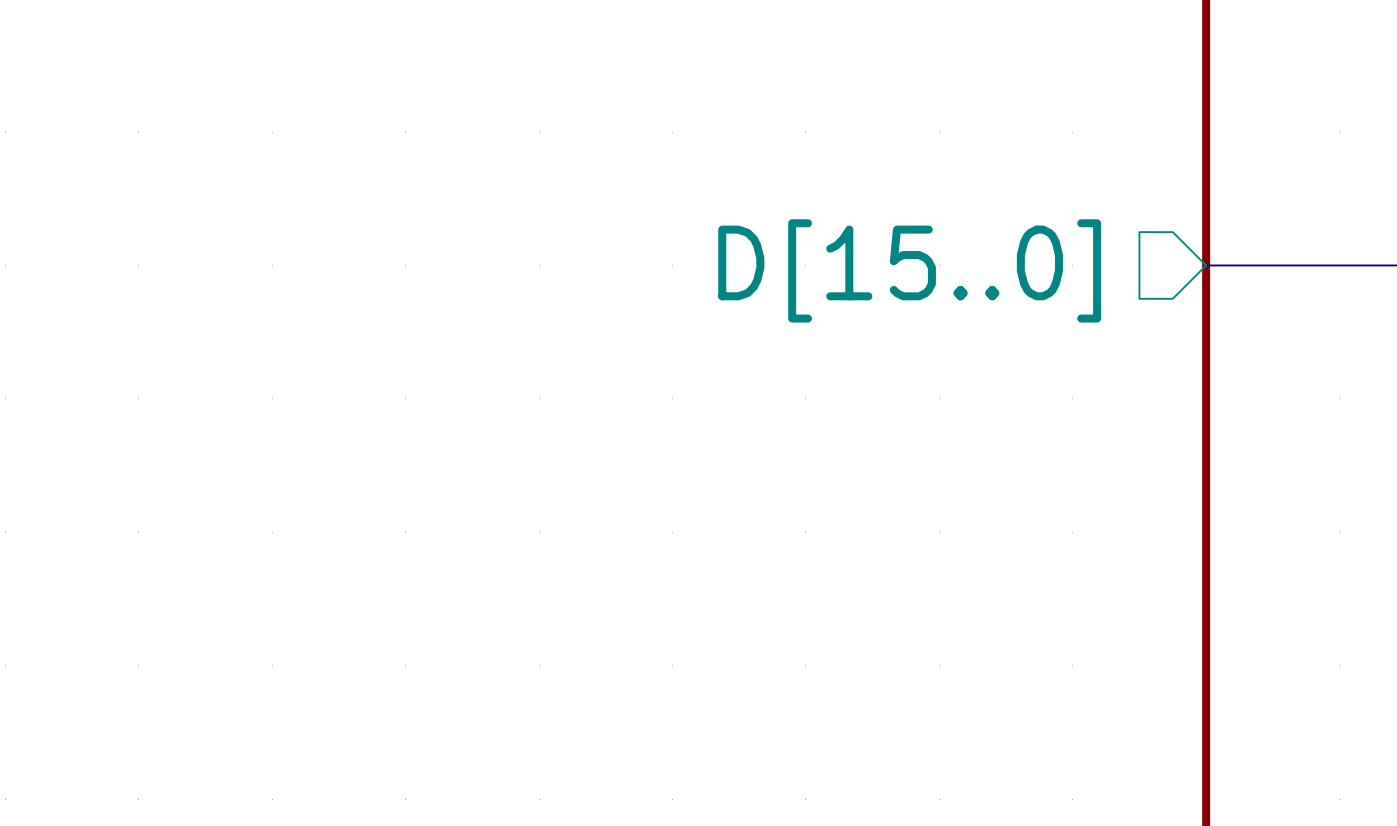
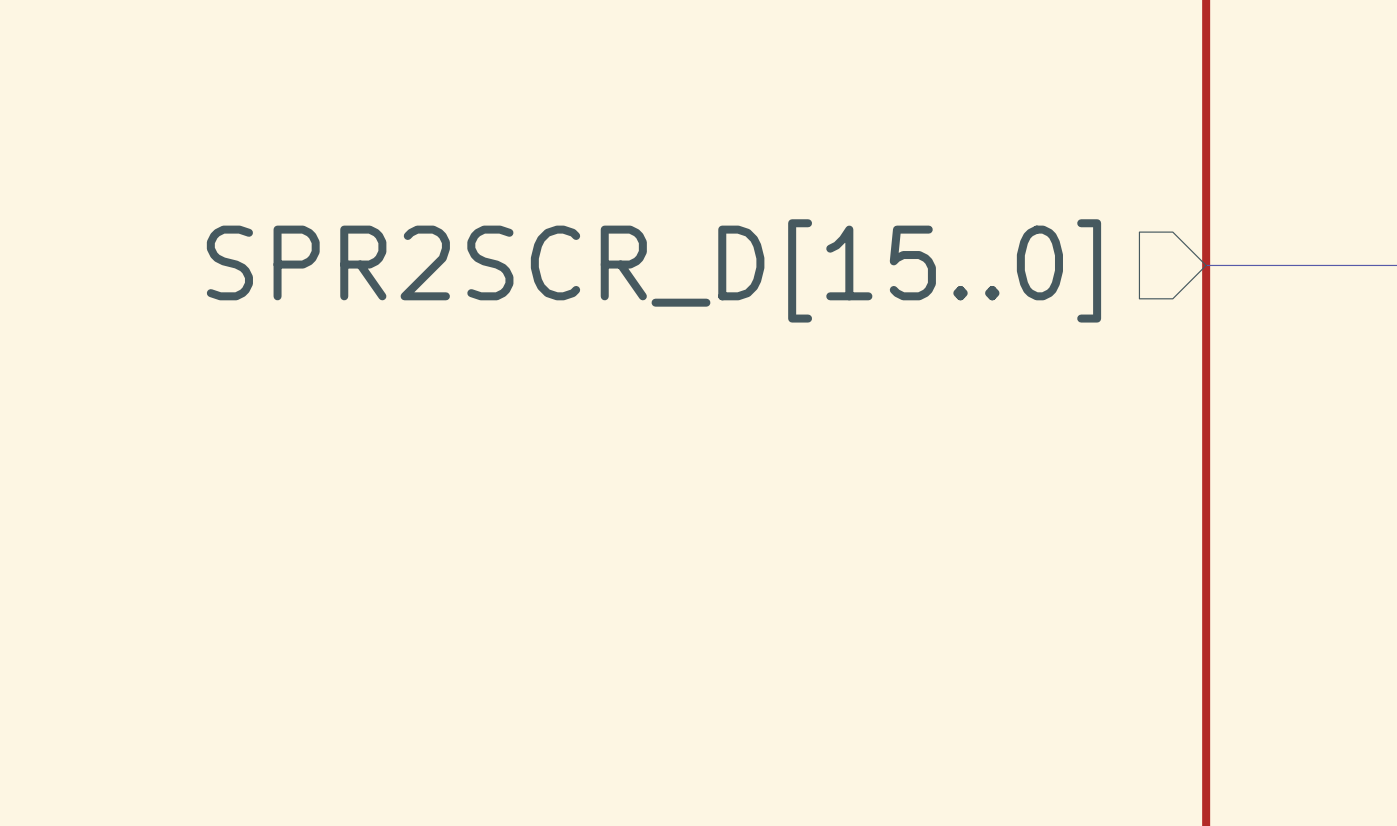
sheet pin: D[15..0] (909, 270) -> SPR2SCR_D[15..0] (653, 270)

